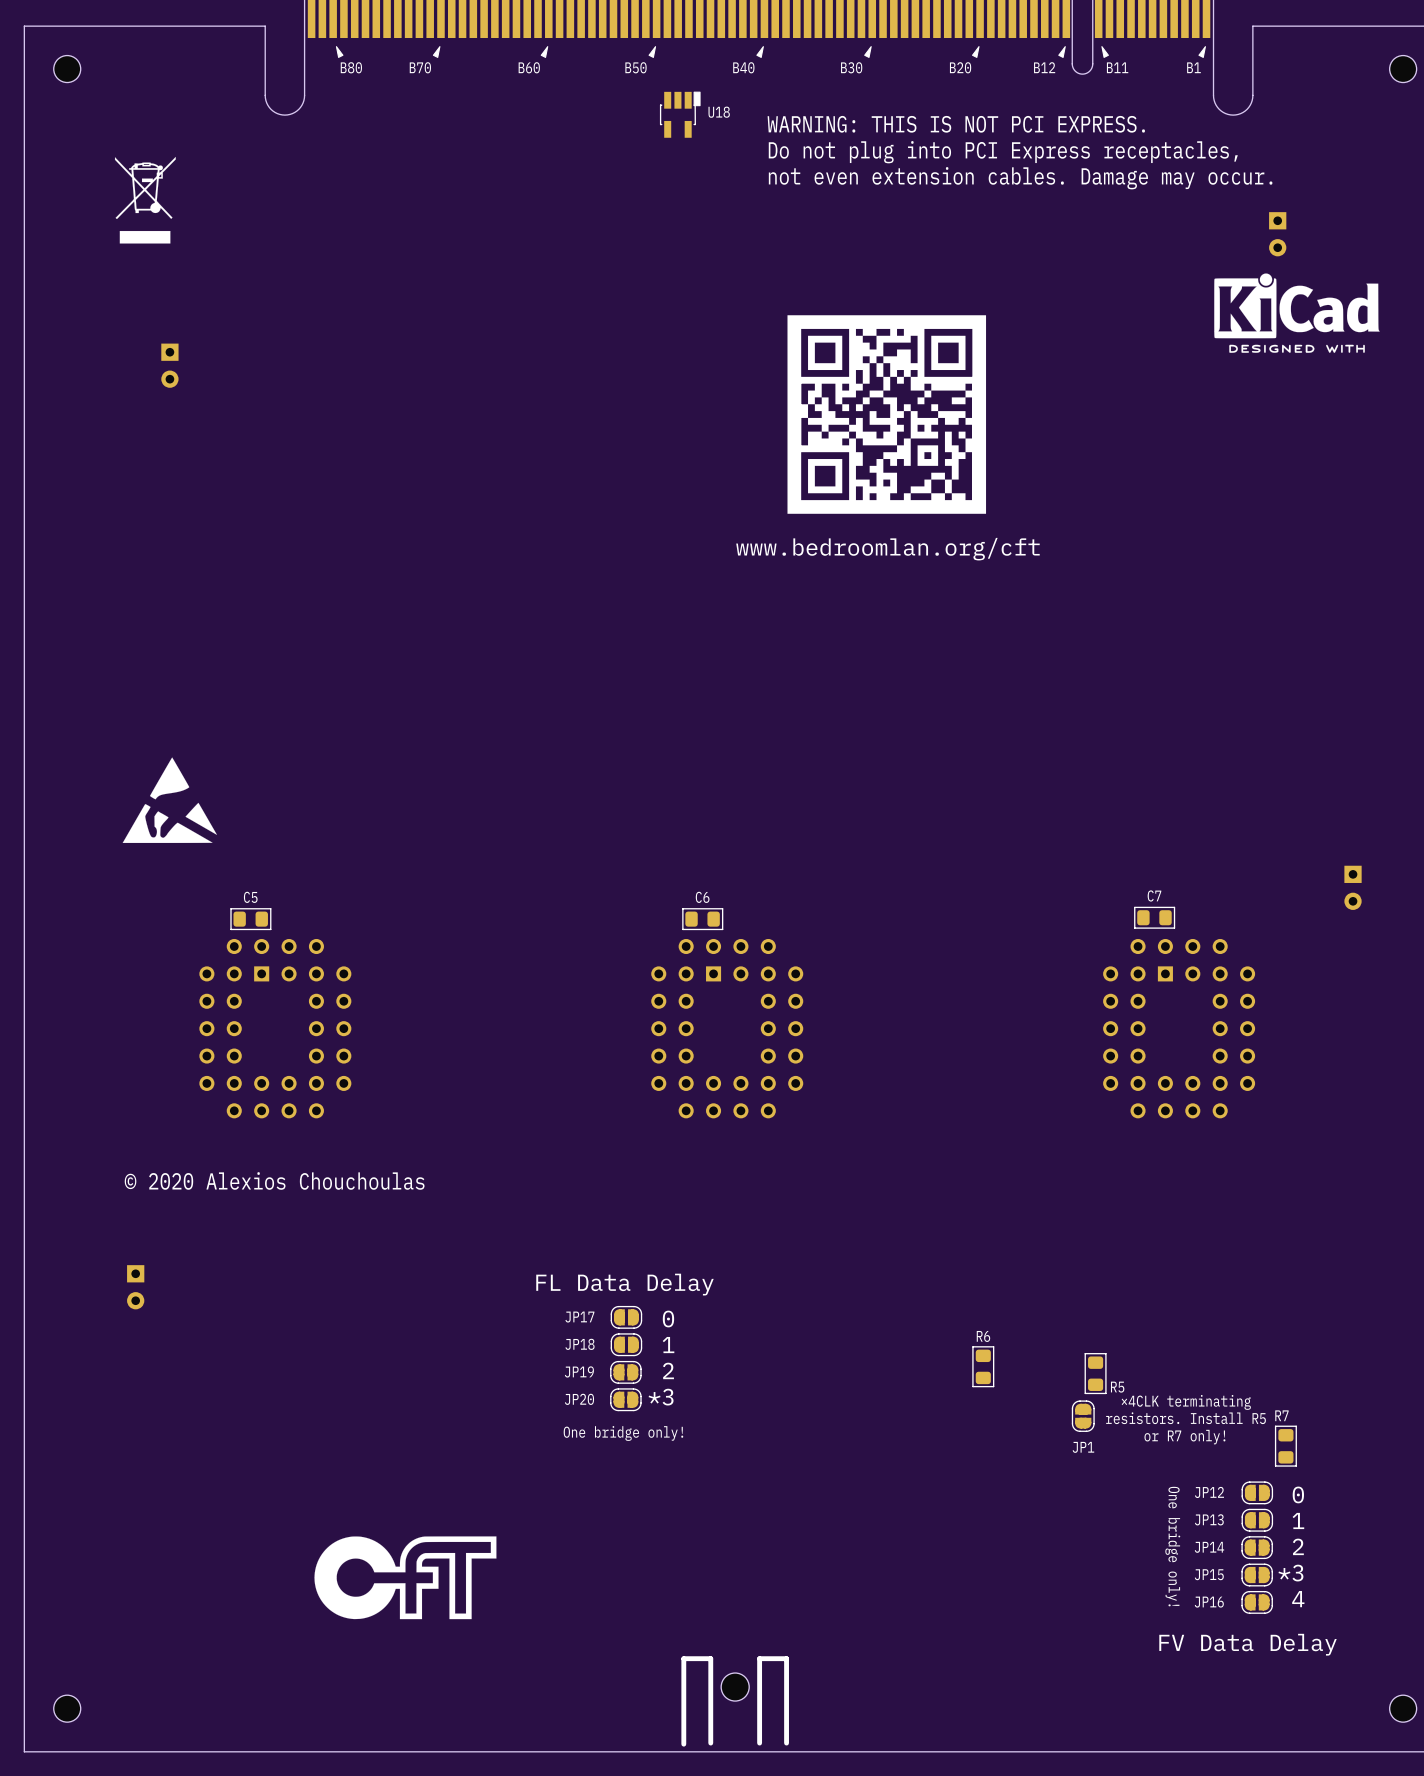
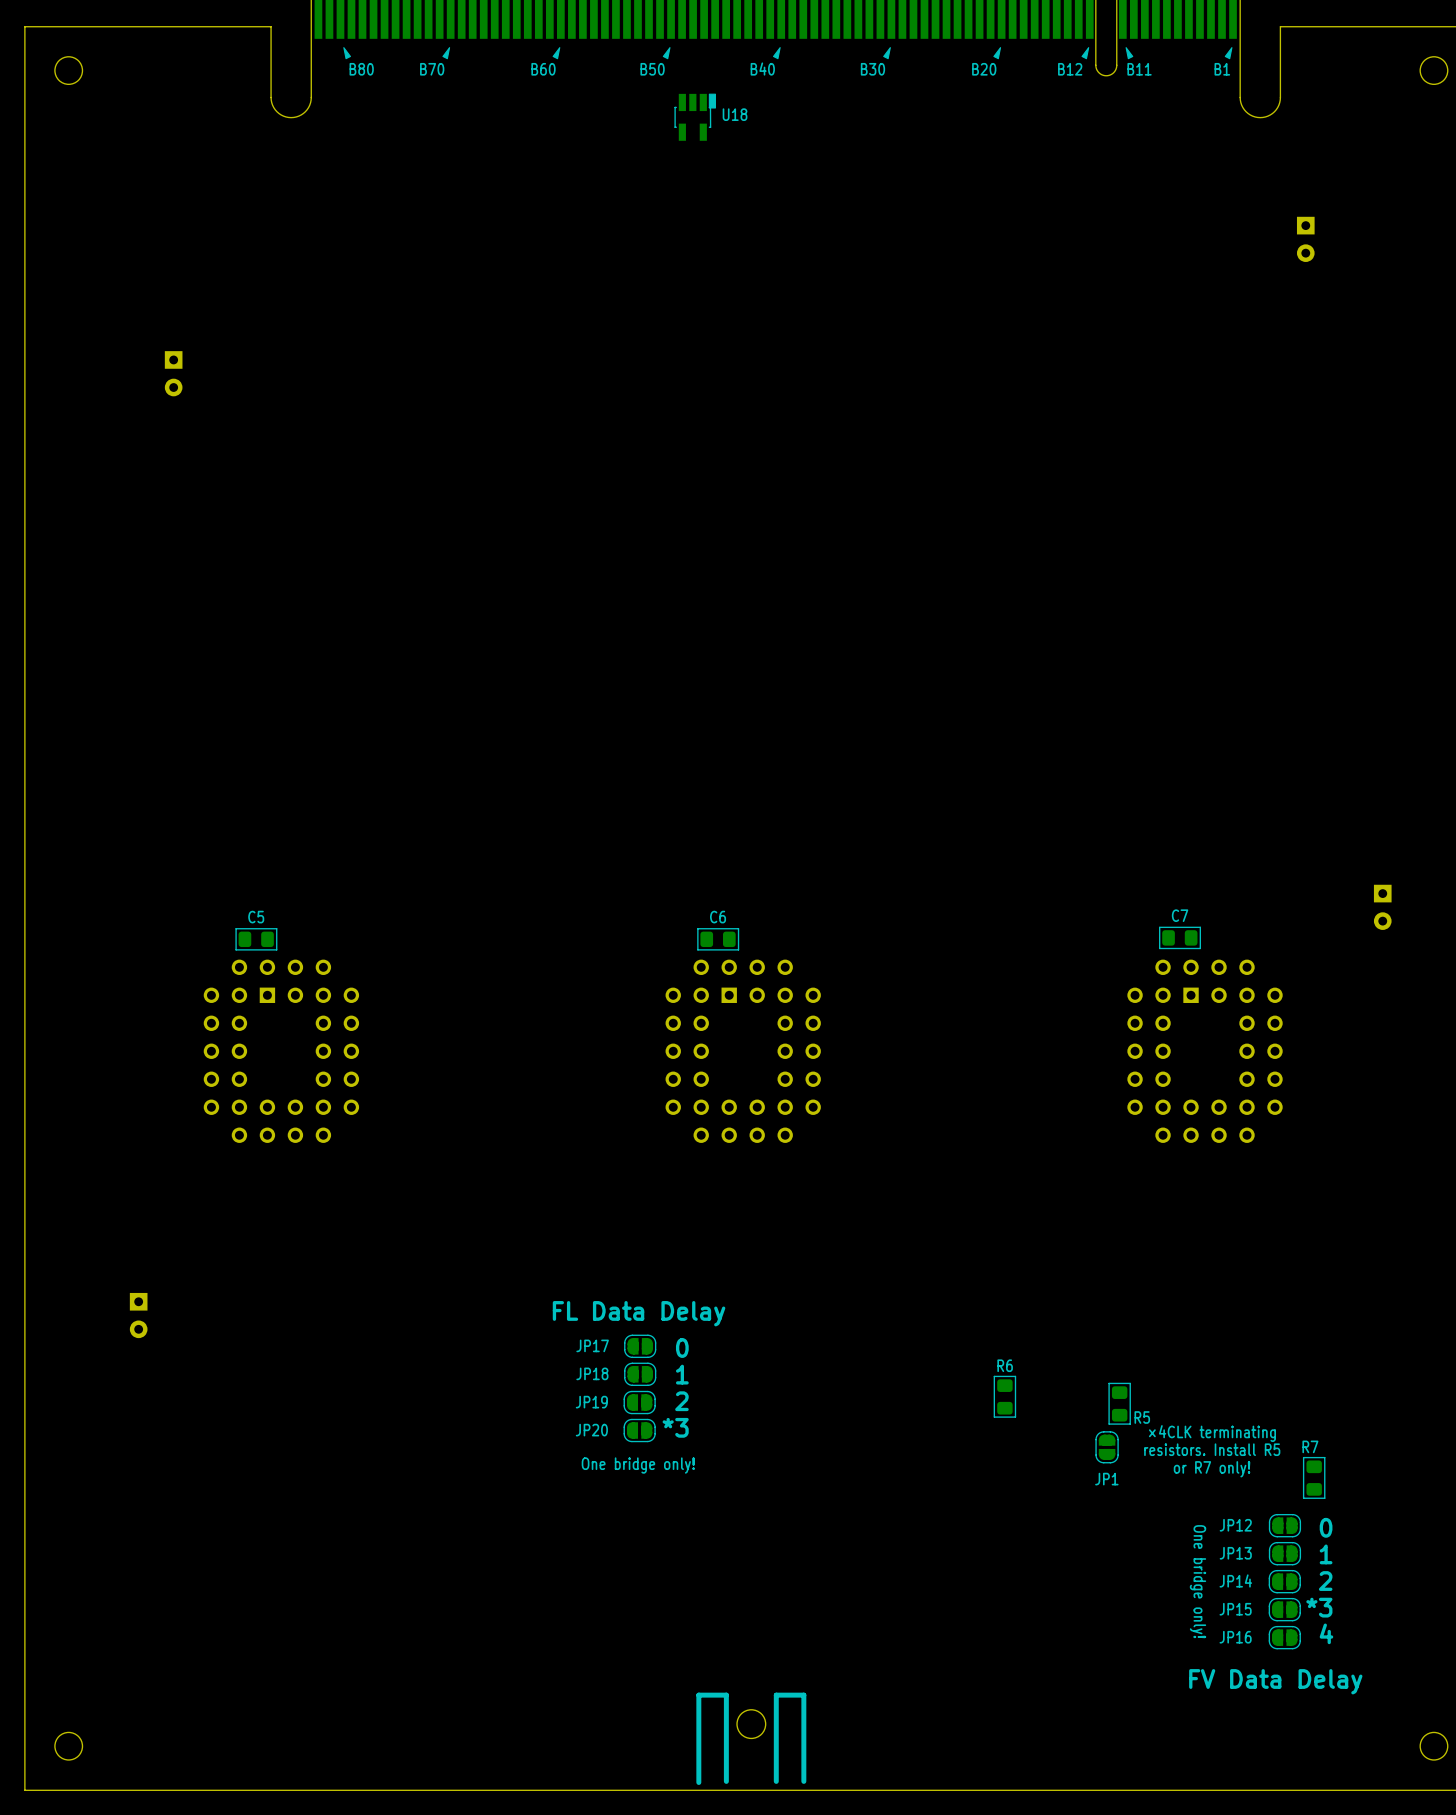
text: WARNING: THIS IS NOT PCI EXPRESS. (956, 124) -> none
text: Do not plug into PCI Express receptacles, (1003, 152) -> none
drawing: [114, 156, 176, 244] -> none
text: not even extension cables. Damage may occur. (1020, 178) -> none
drawing: [1214, 273, 1380, 353] -> none
drawing: [787, 315, 987, 514] -> none
text: www.bedroomlan.org/cft (887, 549) -> none
drawing: [122, 757, 217, 843] -> none
text: © 2020 Alexios Chouchoulas (274, 1180) -> none
drawing: [314, 1536, 497, 1620] -> none

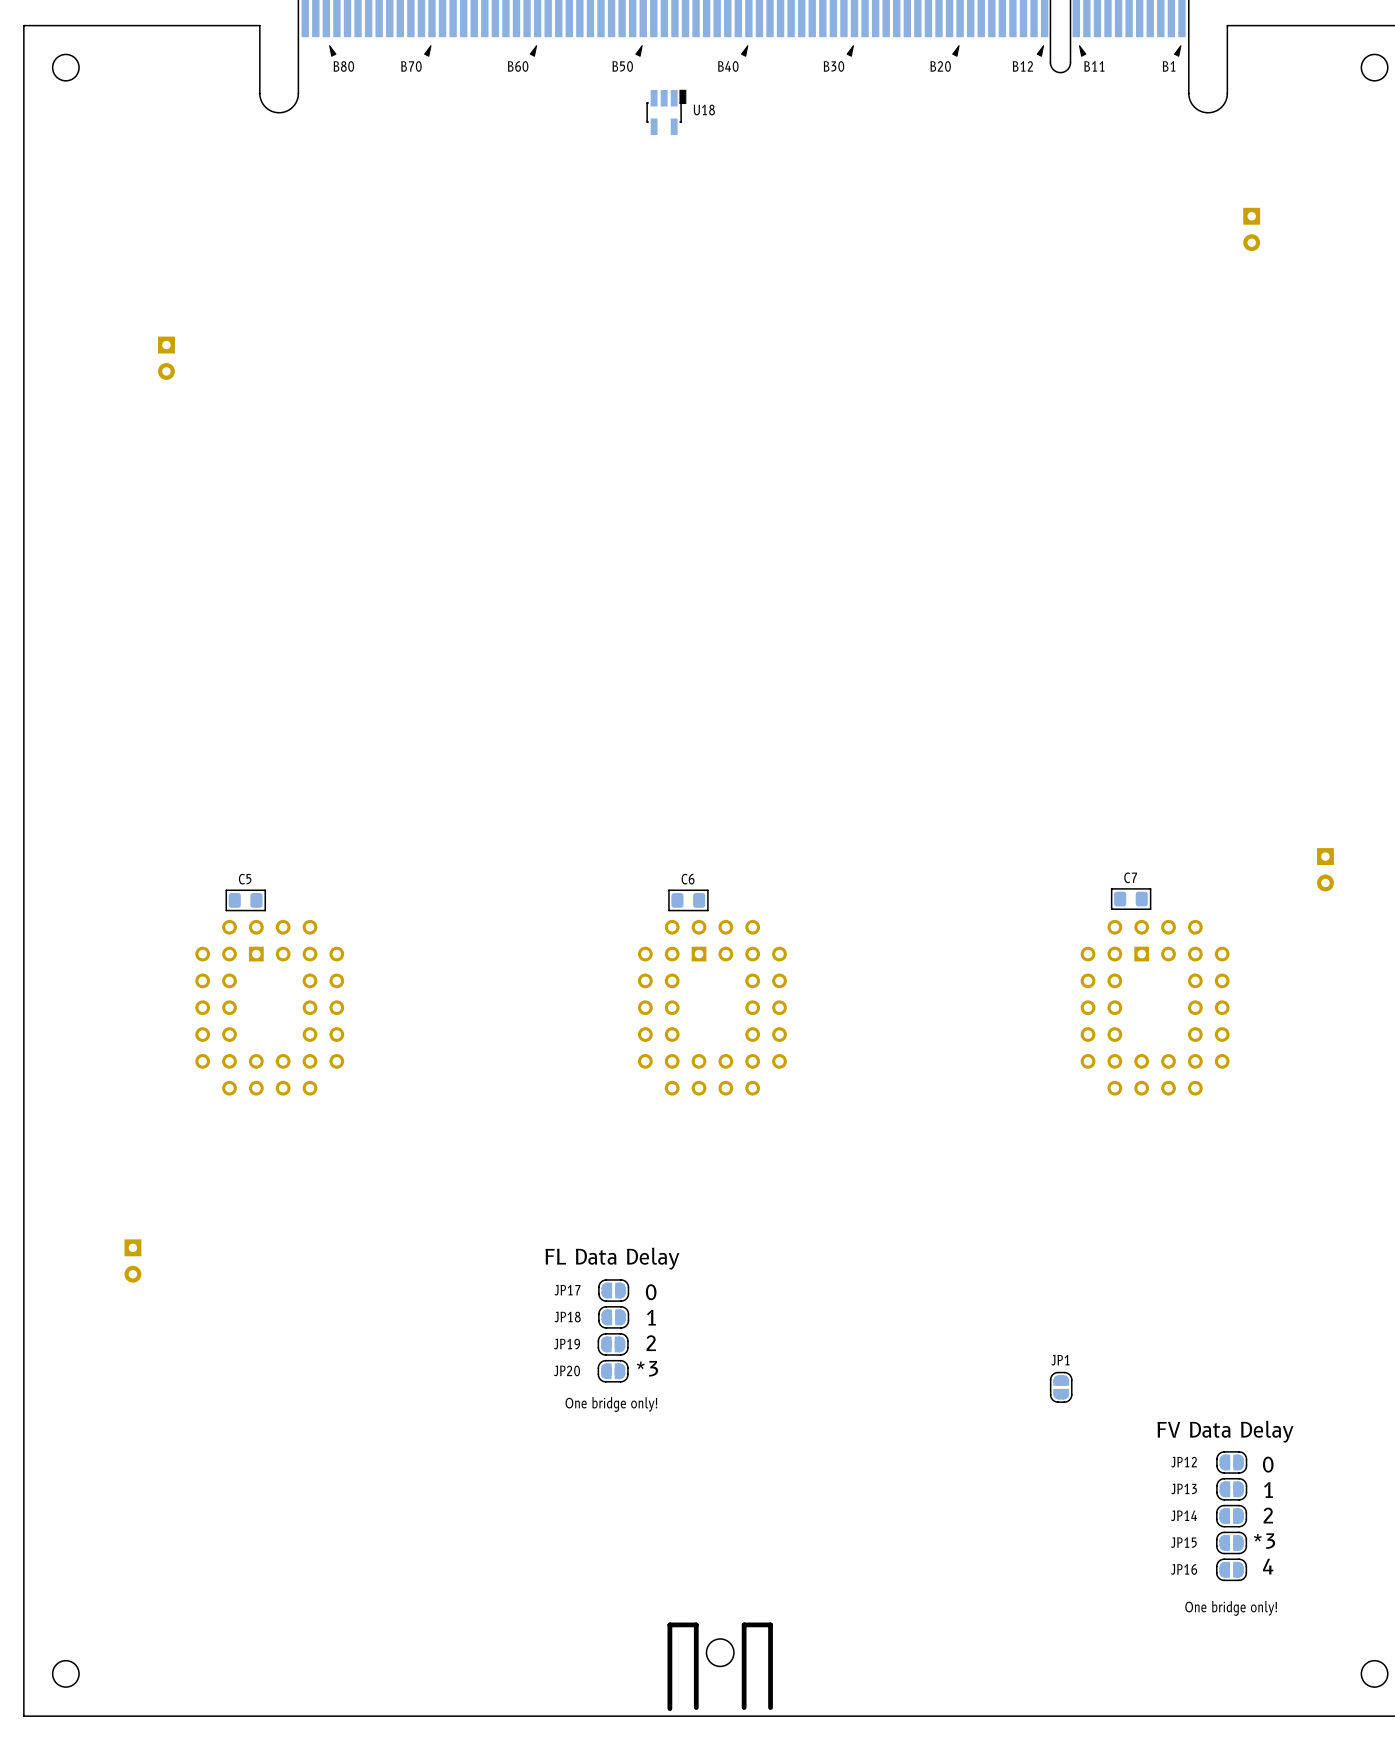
R6: (1004, 1396) -> none
R5: (1119, 1403) -> none
text: ×4CLK terminating (1212, 1433) -> none
text: resistors. Install R5 (1212, 1449) -> none
text: or R7 only! (1212, 1469) -> none
R7: (1314, 1477) -> none
JP1 name position: JP1 (1106, 1479) -> JP1 (1060, 1360)
text: none -> FV Data Delay (1225, 1431)
text: One bridge only! (1198, 1581) -> none
text: FV Data Delay (1275, 1681) -> One bridge only! (1231, 1608)

